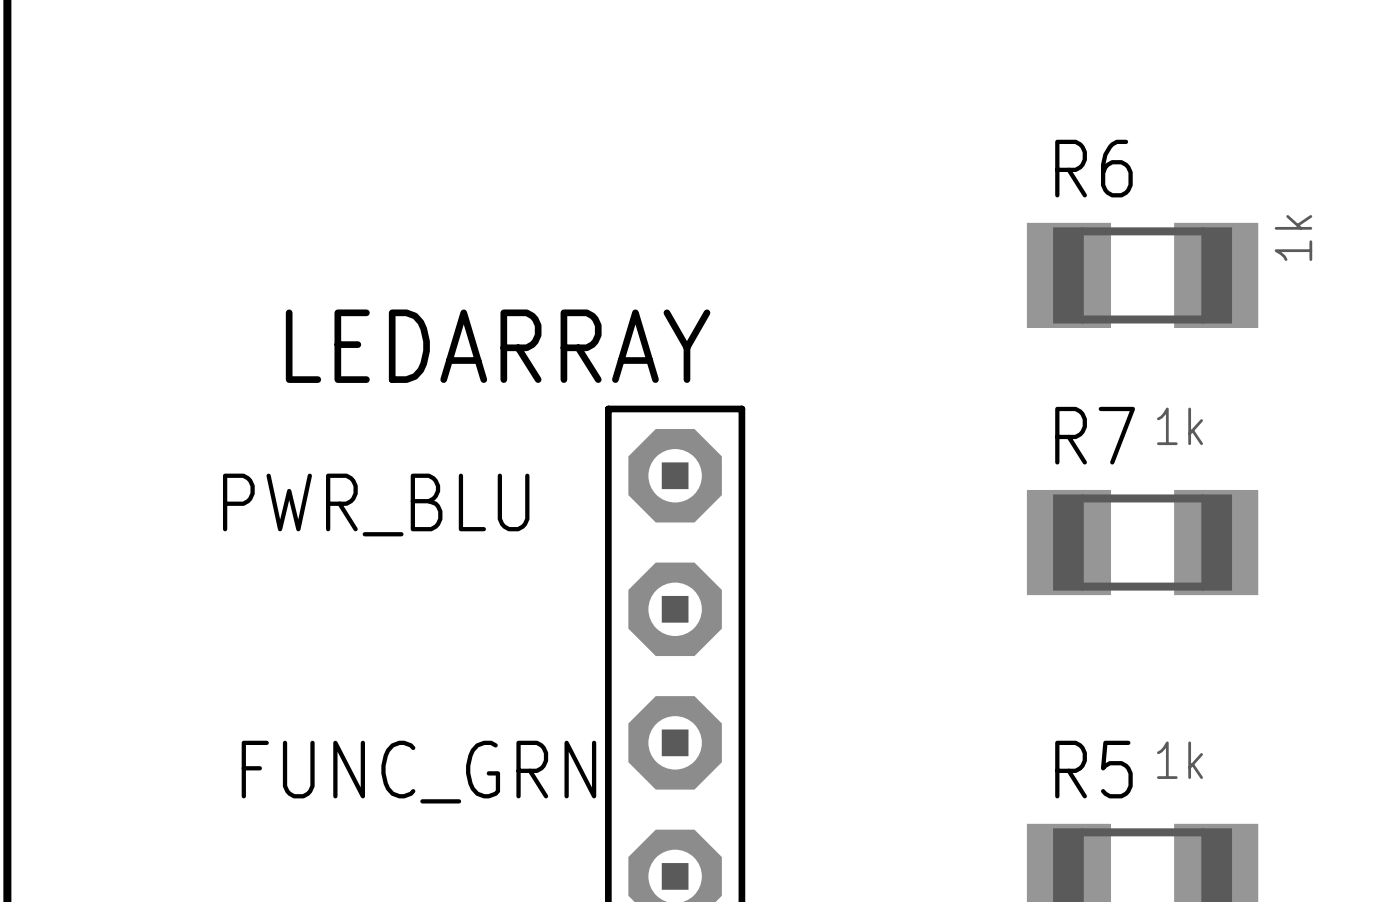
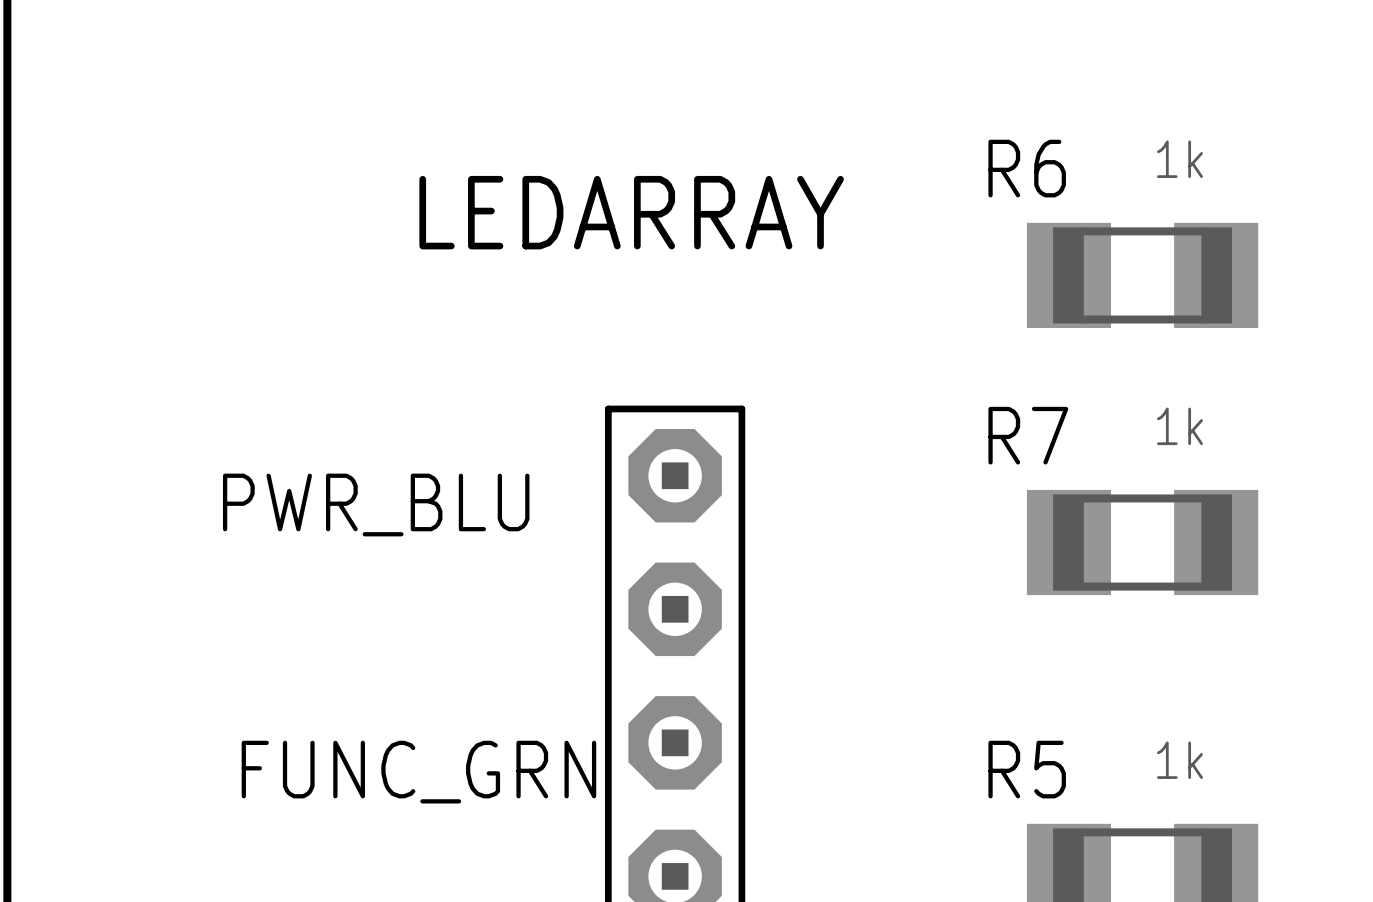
R6 name position: R6 (1093, 168) -> R6 (1027, 168)
R6 value rotation: 0° (1293, 238) -> 90° clockwise (1179, 159)
R6 value position: 1k (1293, 238) -> 1k (1179, 159)
LEDARRAY name position: LEDARRAY (498, 346) -> LEDARRAY (631, 212)
R7 name position: R7 (1095, 435) -> R7 (1028, 435)
R5 name position: R5 (1093, 769) -> R5 (1027, 769)

